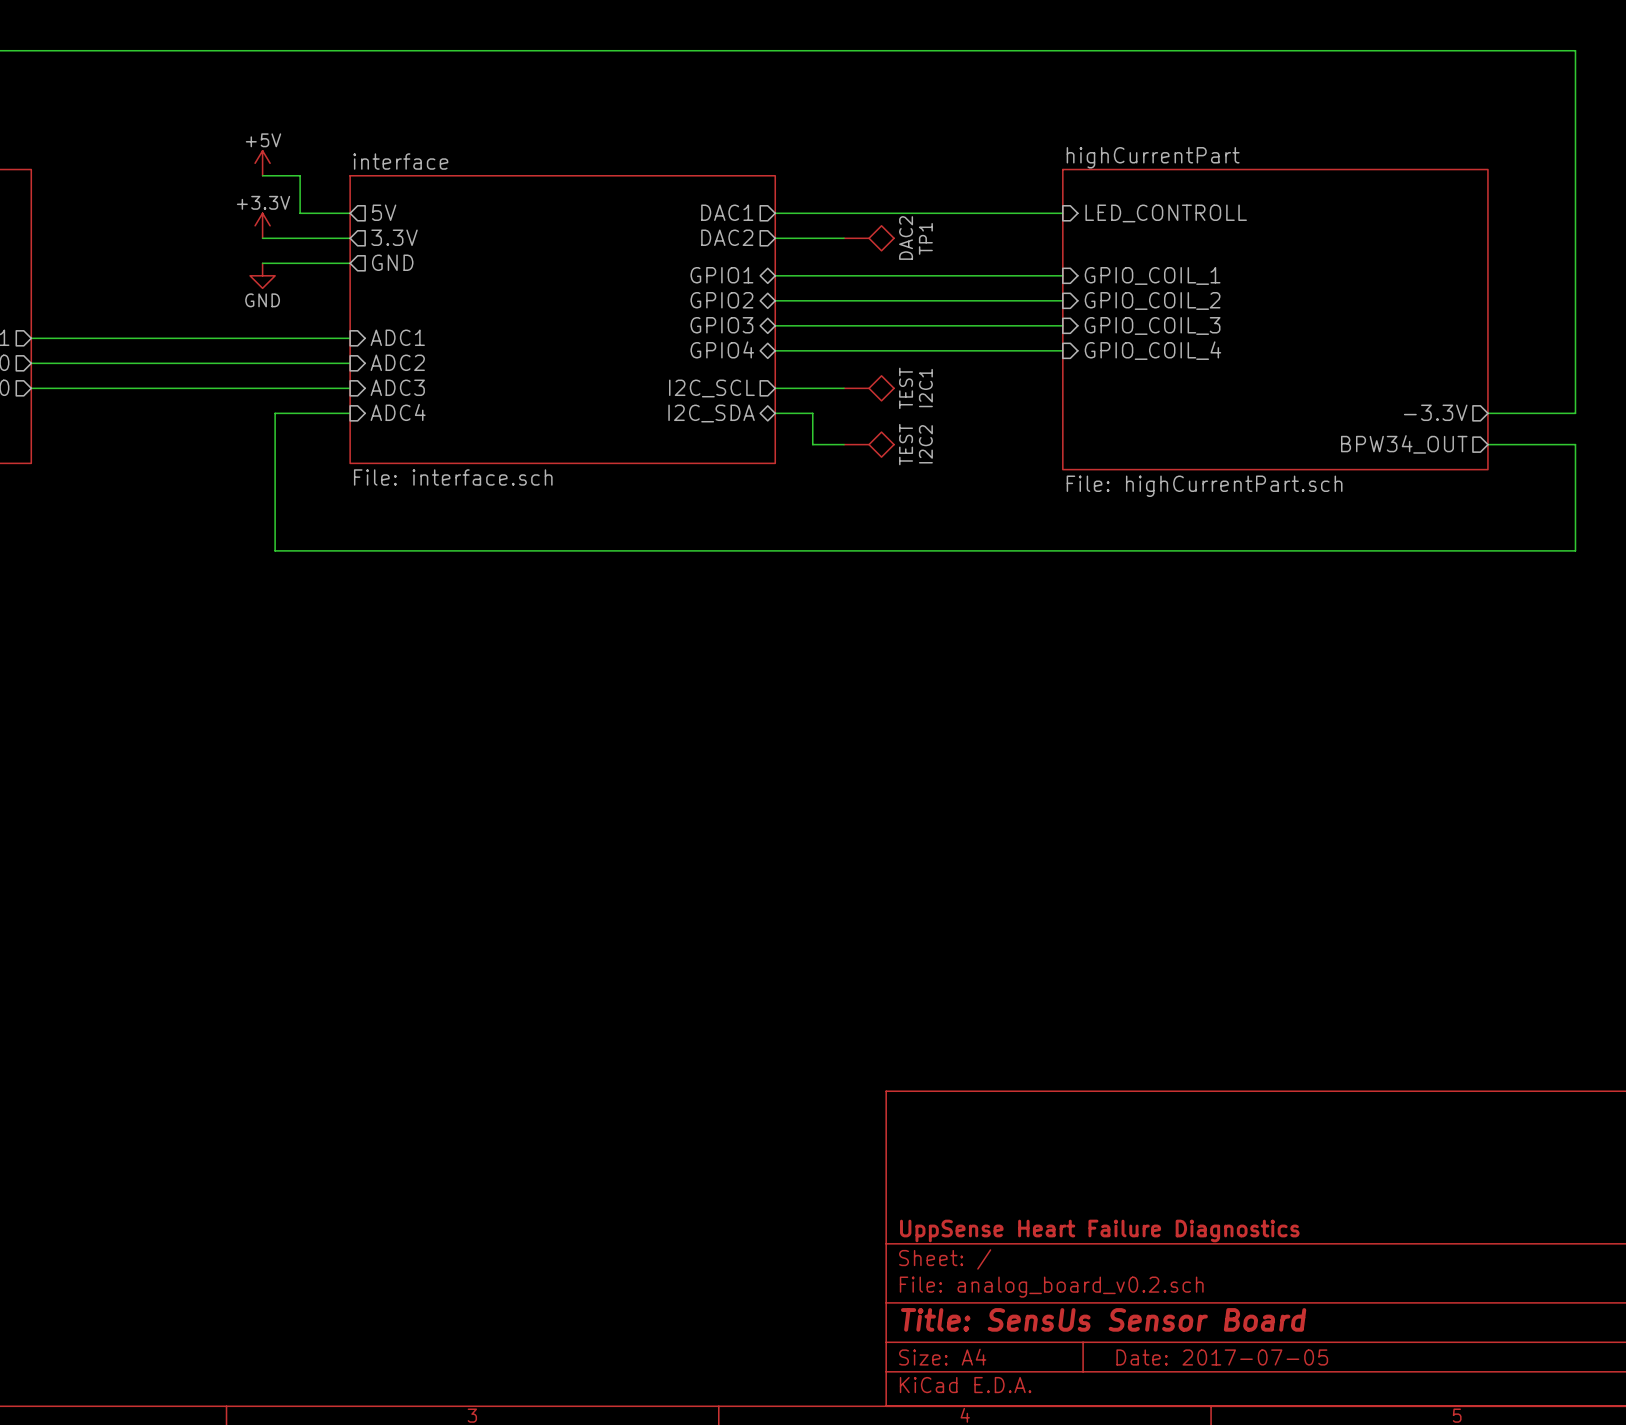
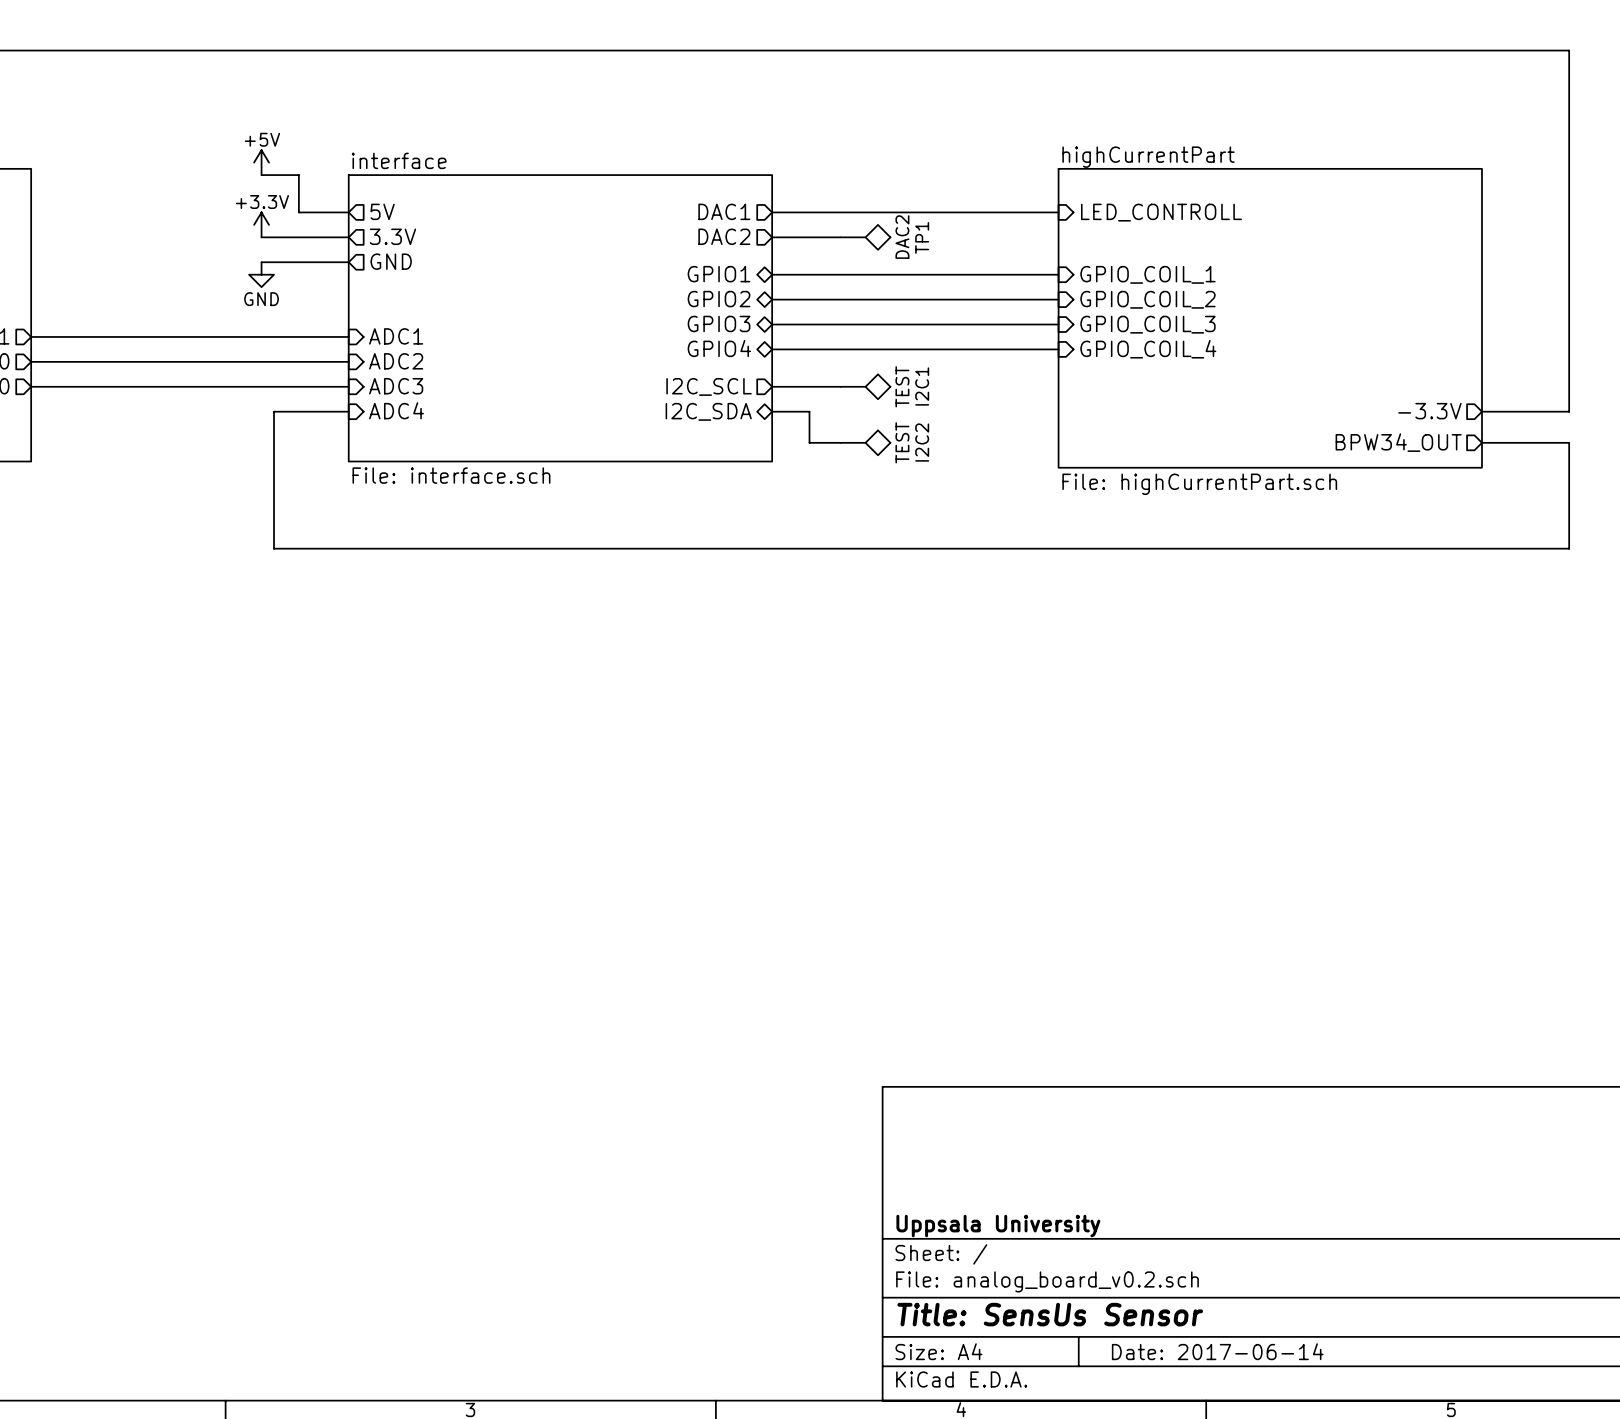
title block: UppSense Heart Failure Diagnostics (1099, 1230) -> Uppsala University (998, 1226)
title block: Title: SensUs Sensor Board (1103, 1319) -> Title: SensUs Sensor (1050, 1314)
title block: Date: 2017-07-05 (1222, 1357) -> Date: 2017-06-14 (1217, 1351)

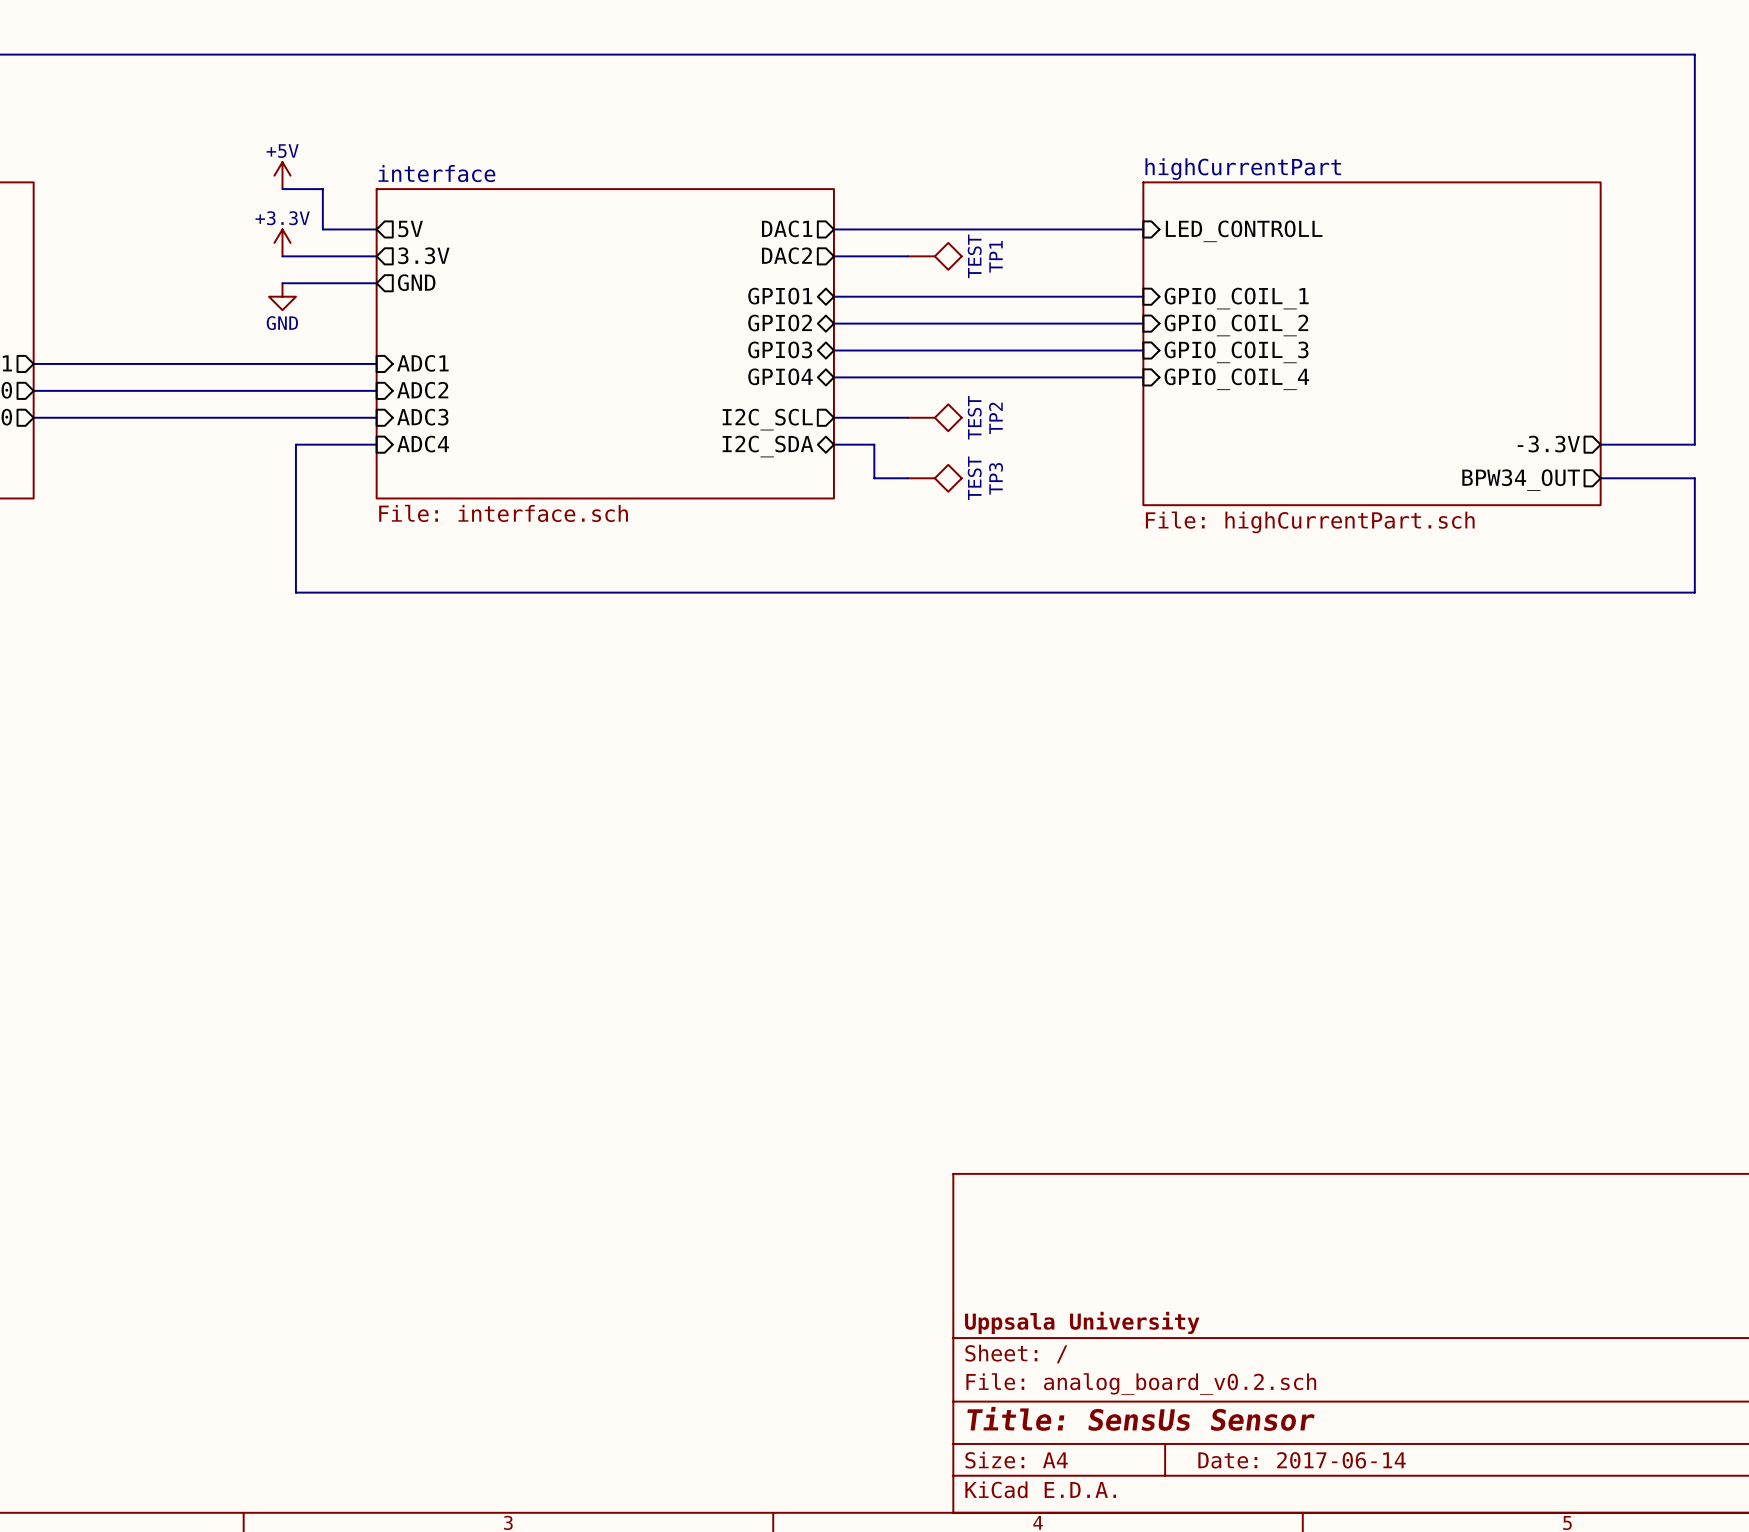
TP1 value: DAC2 (902, 237) -> TEST (974, 256)
I2C1 name: I2C1 (922, 386) -> TP2 (995, 418)
I2C2 name: I2C2 (922, 442) -> TP3 (996, 478)

